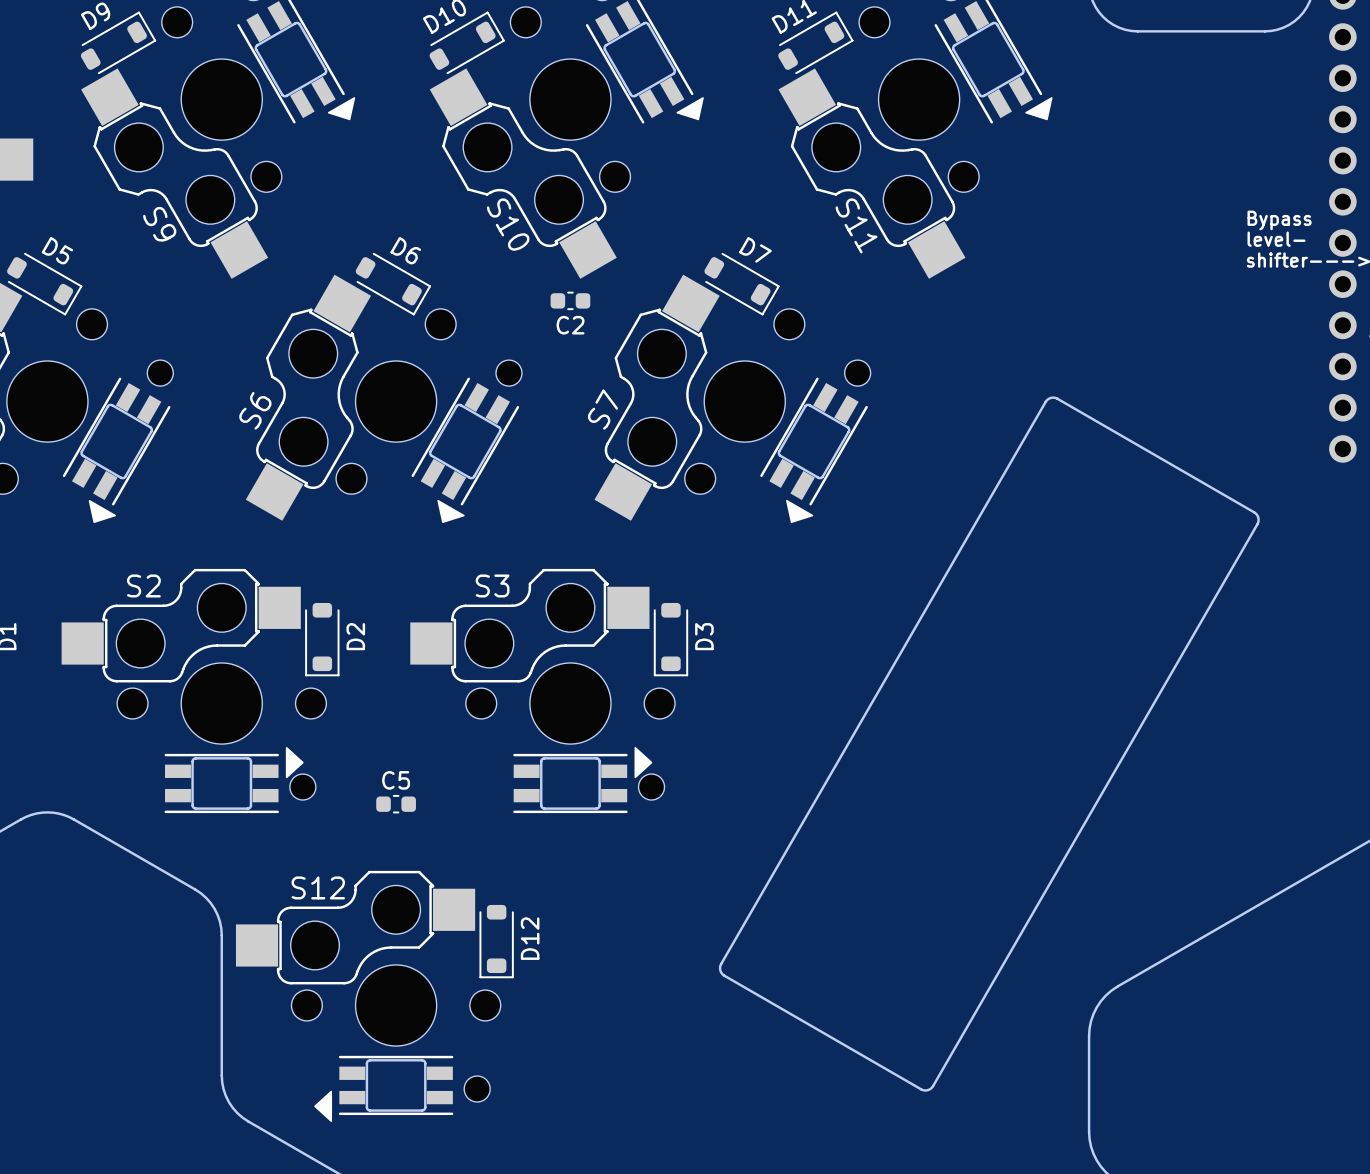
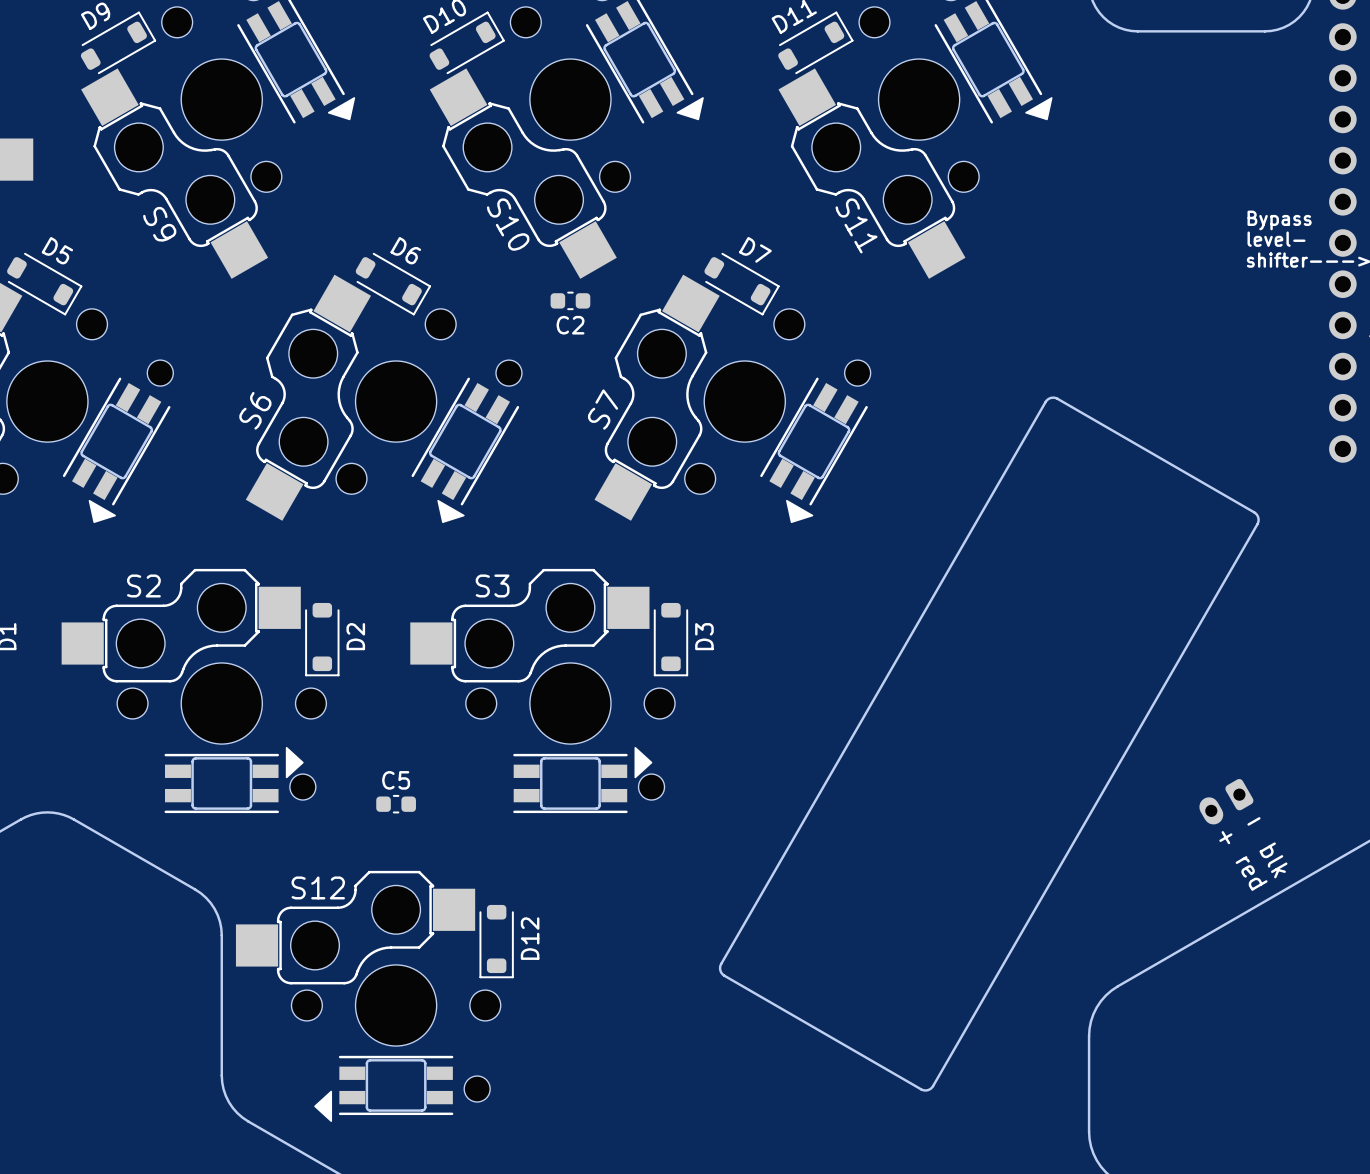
part: none -> (1226, 801)
text: none -> + - (1239, 830)
text: none -> blk (1273, 860)
text: none -> red (1251, 873)

